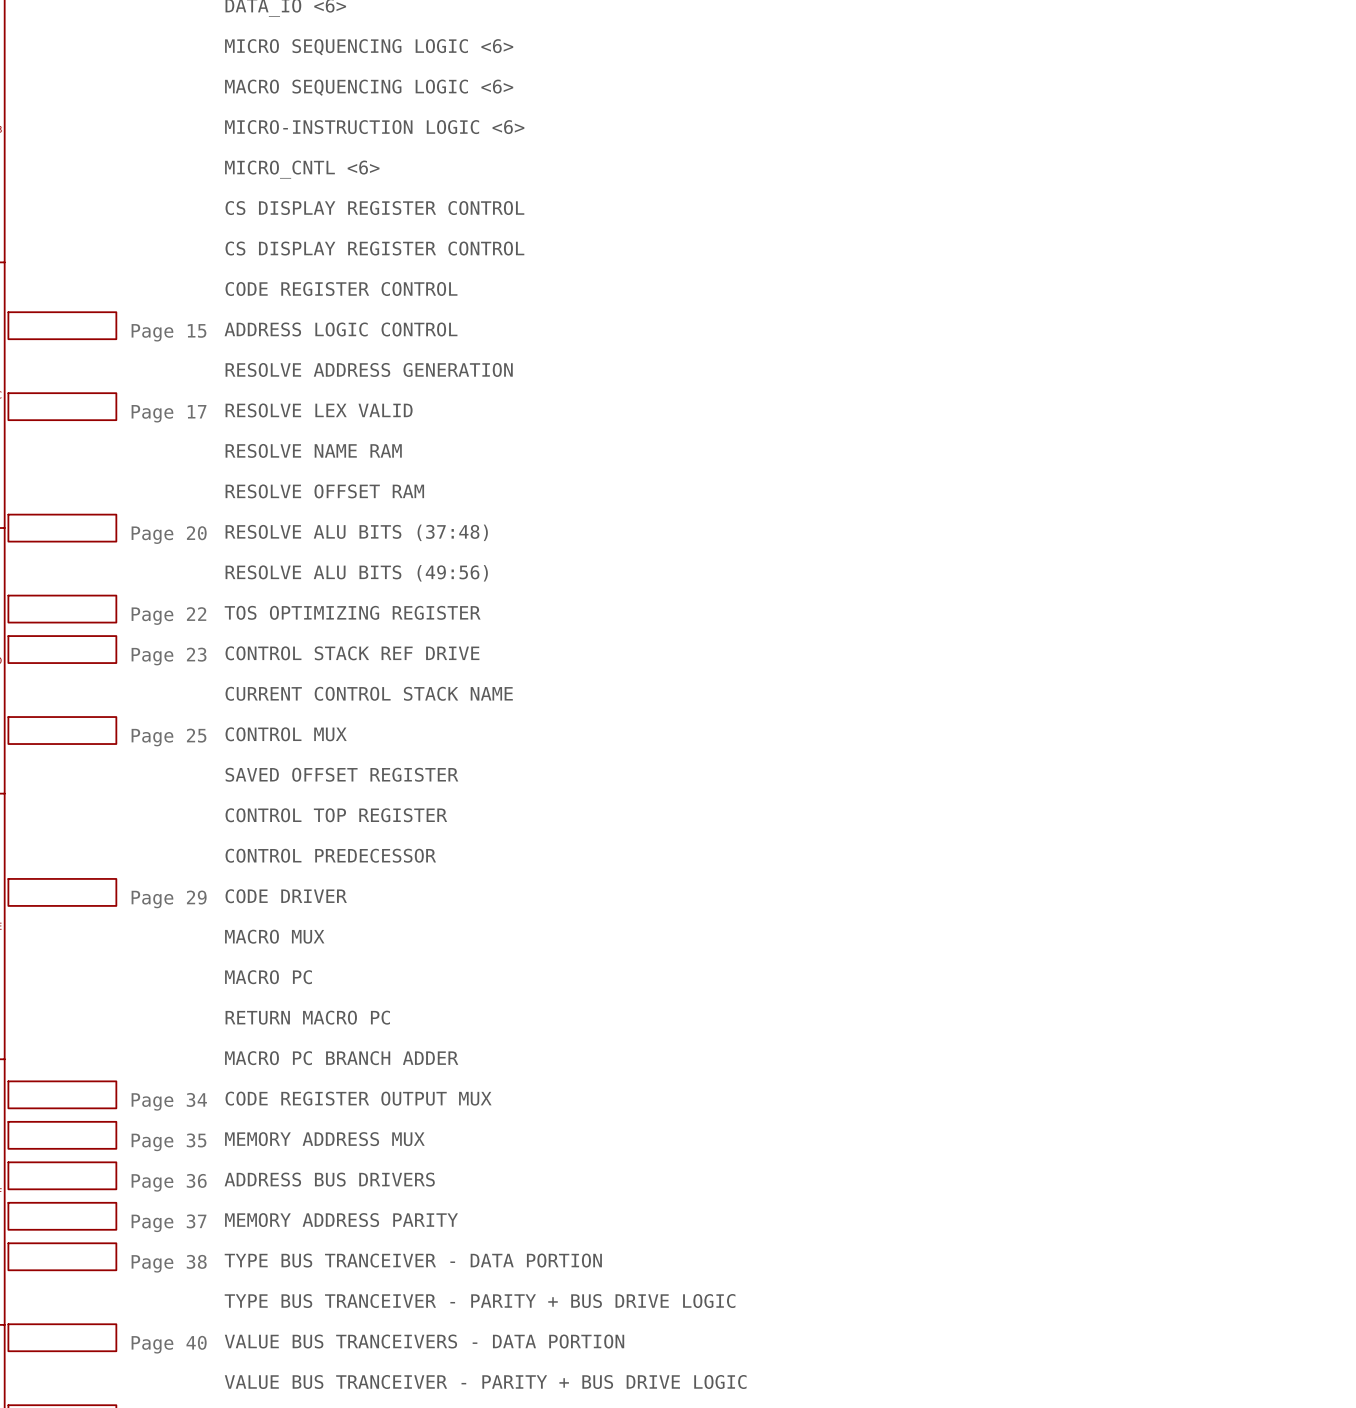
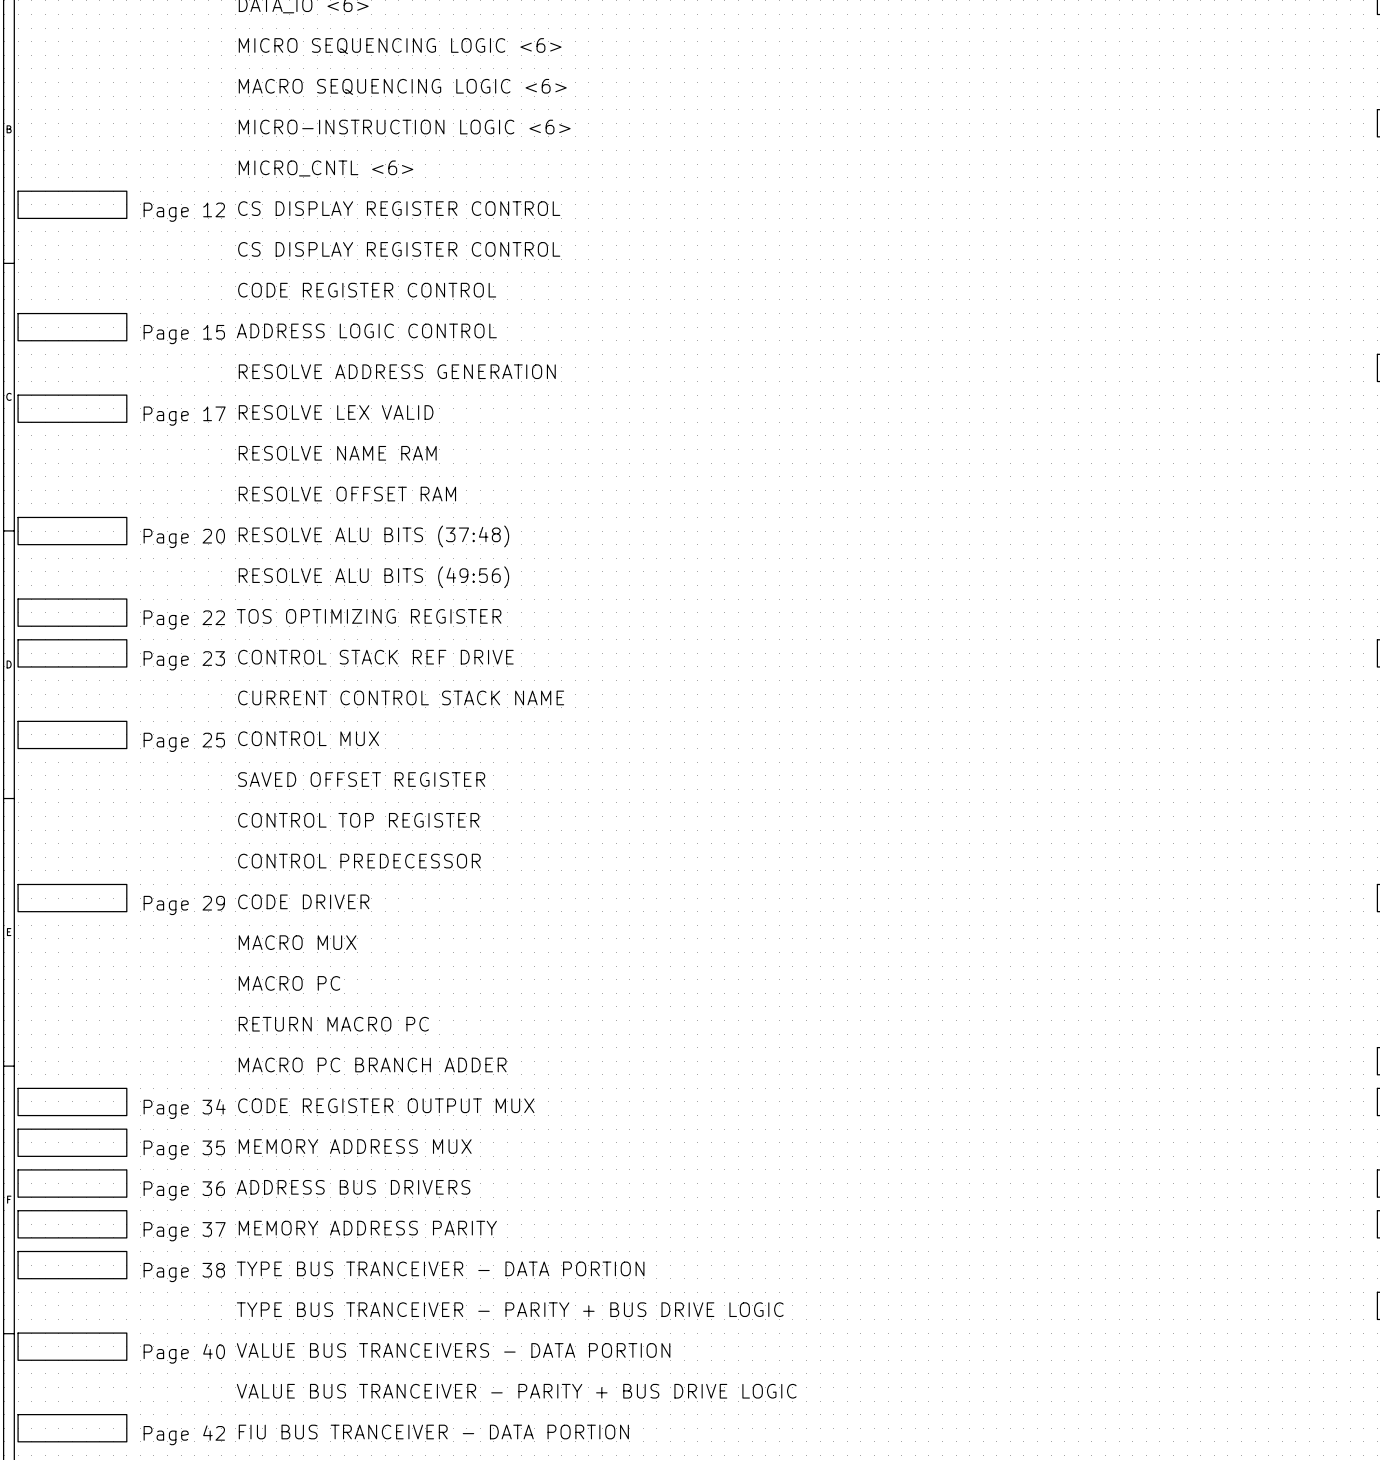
sheet Page 12: none -> (72, 204)

